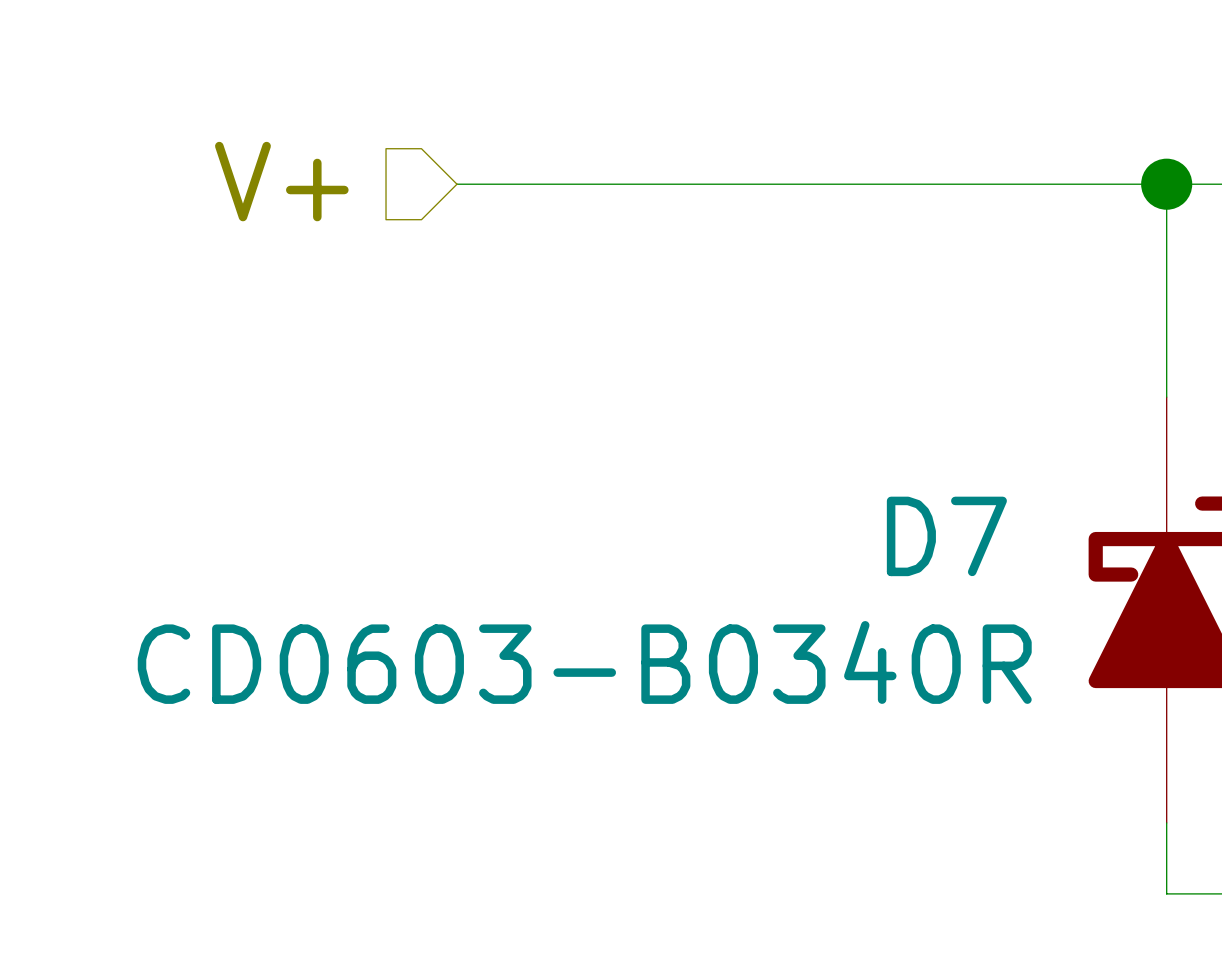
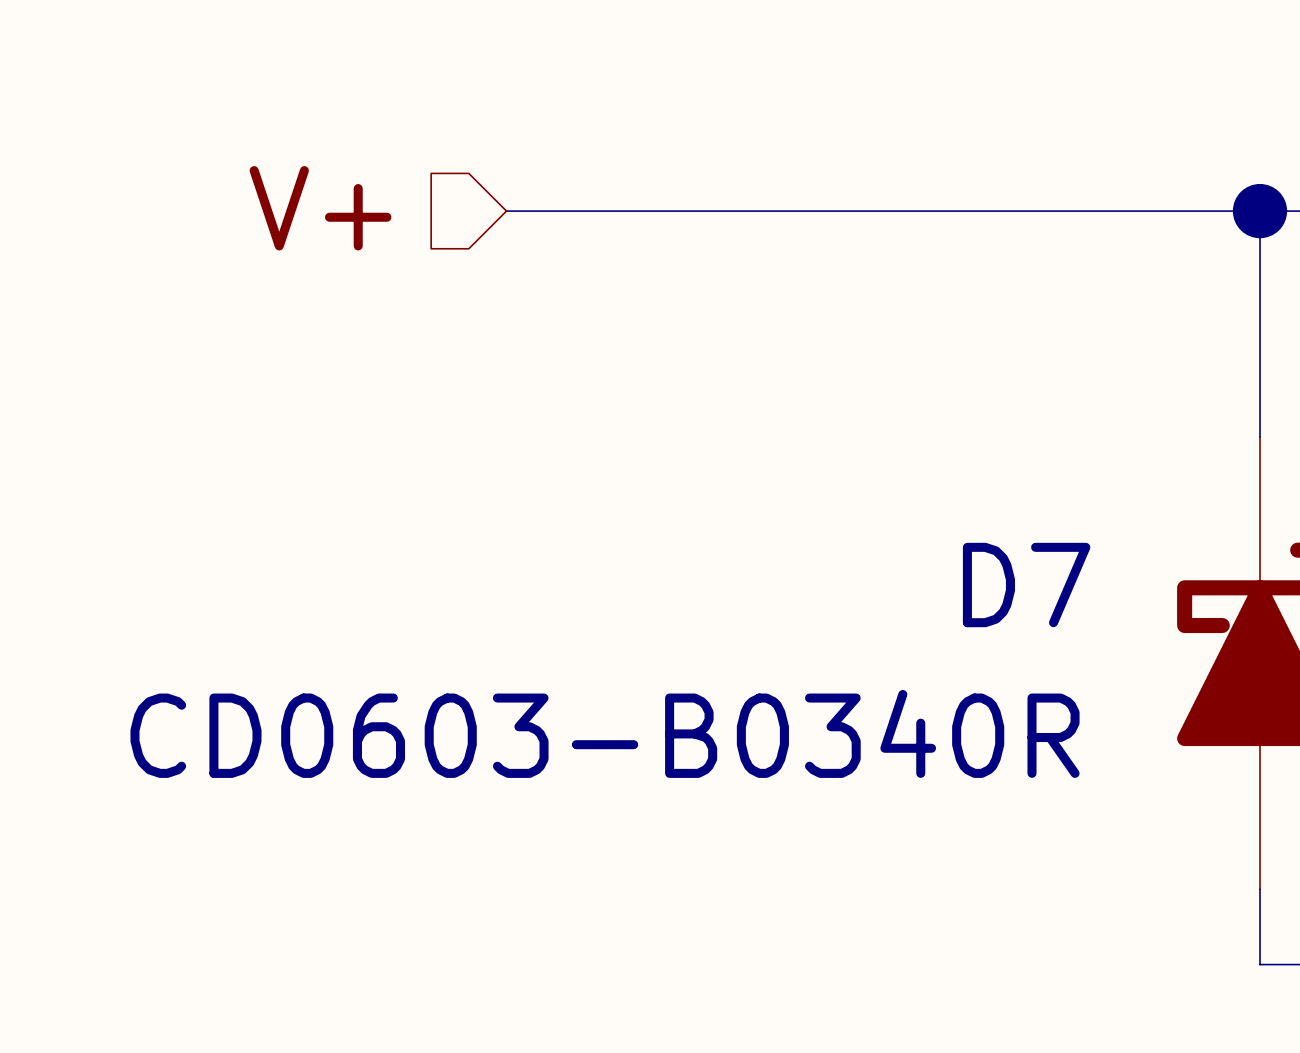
D7 value position: CD0603-B0340R (584, 662) -> CD0603-B0340R (605, 733)

